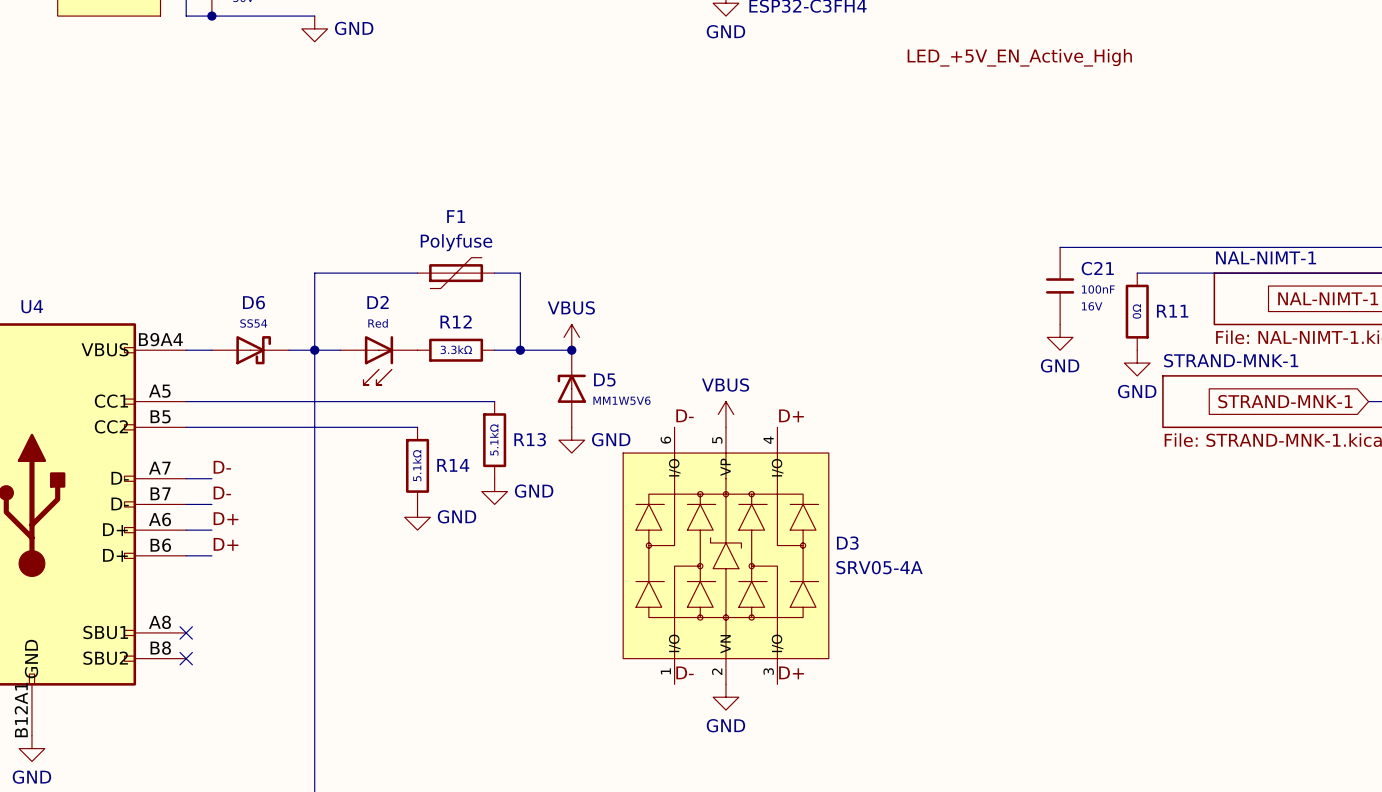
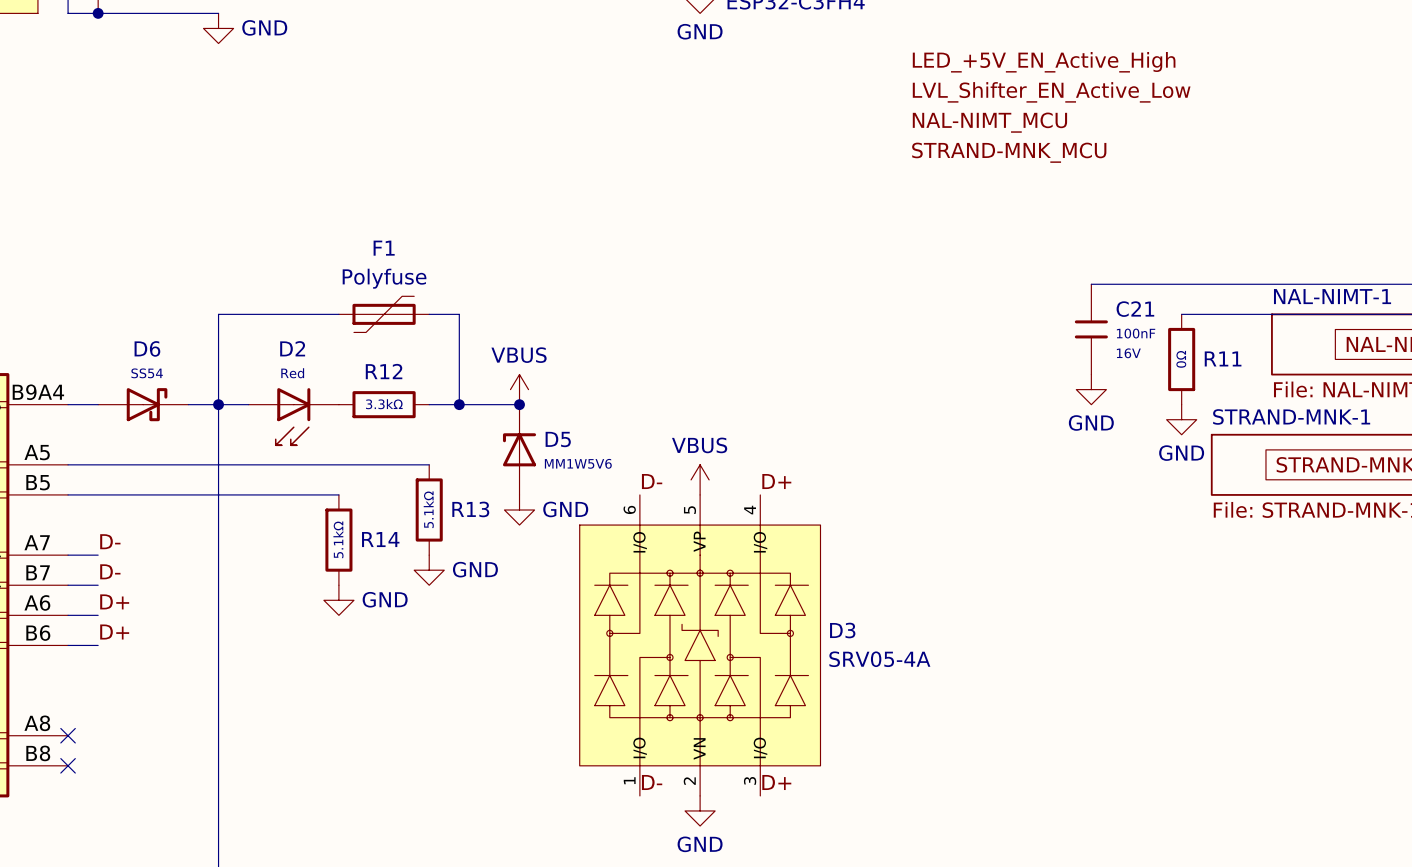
label: none -> LVL_Shifter_EN_Active_Low (1051, 92)
label: none -> NAL-NIMT_MCU (989, 122)
label: none -> STRAND-MNK_MCU (1009, 152)

